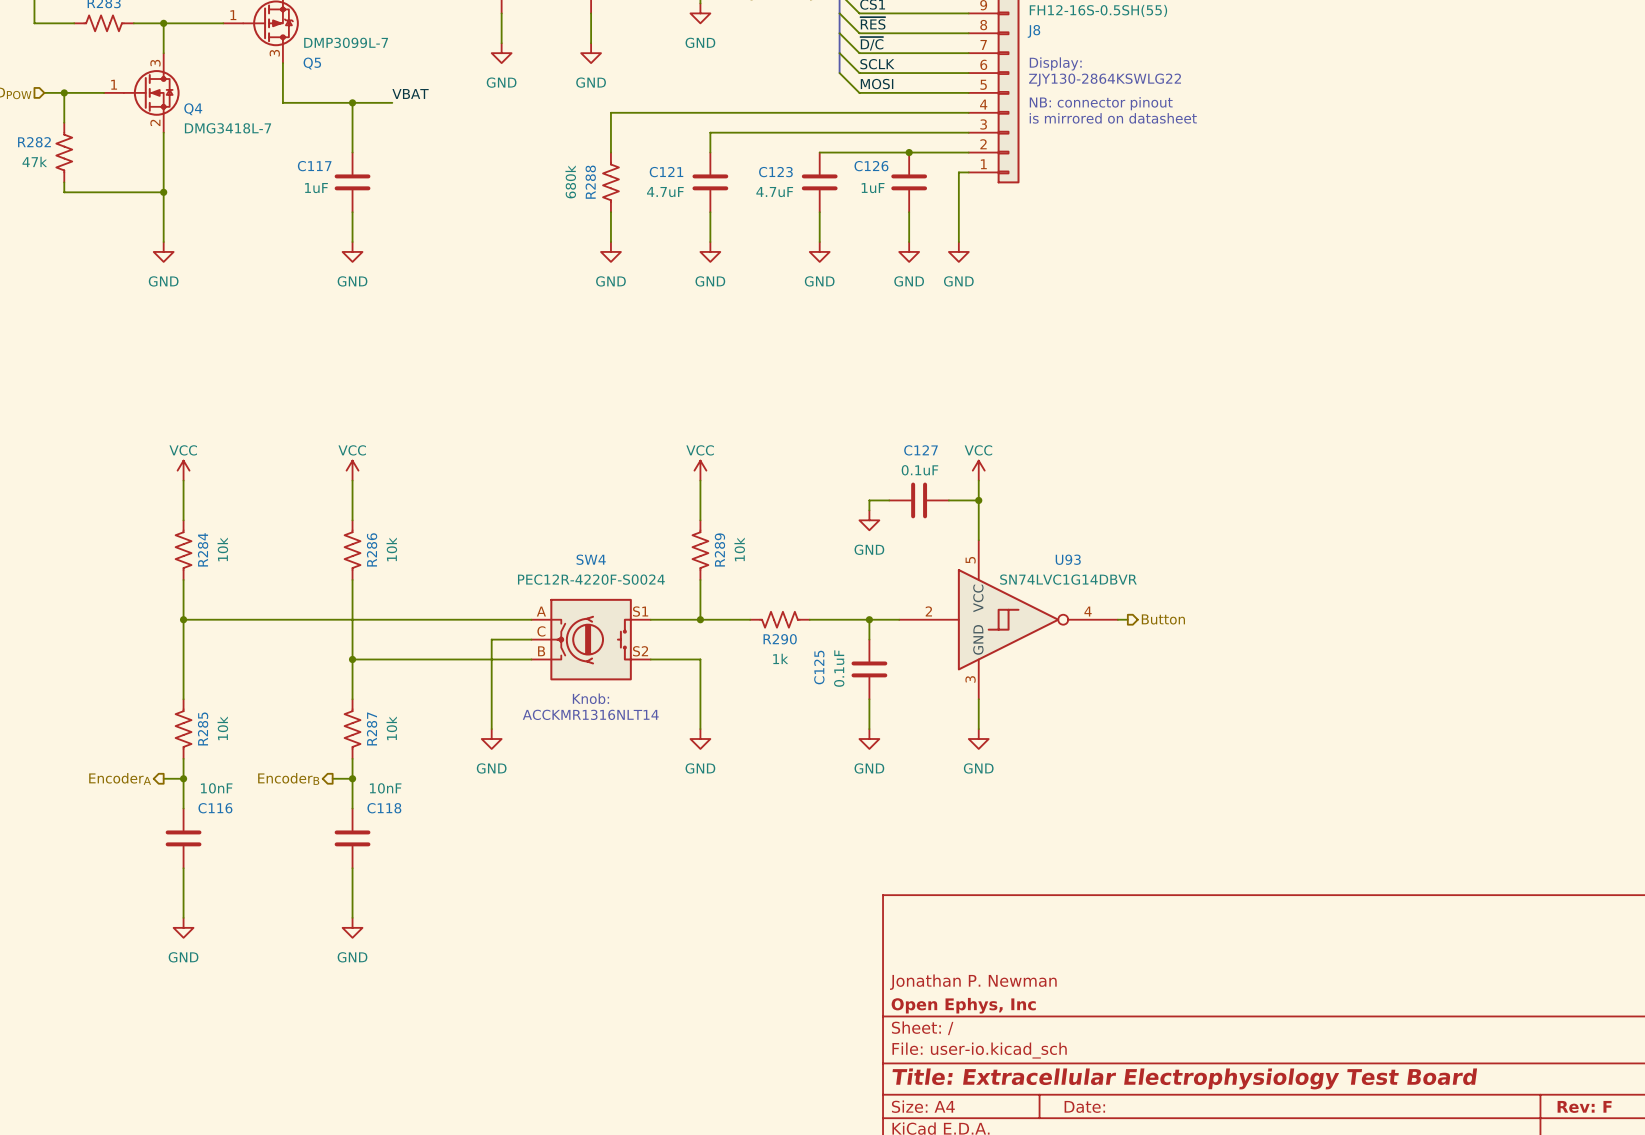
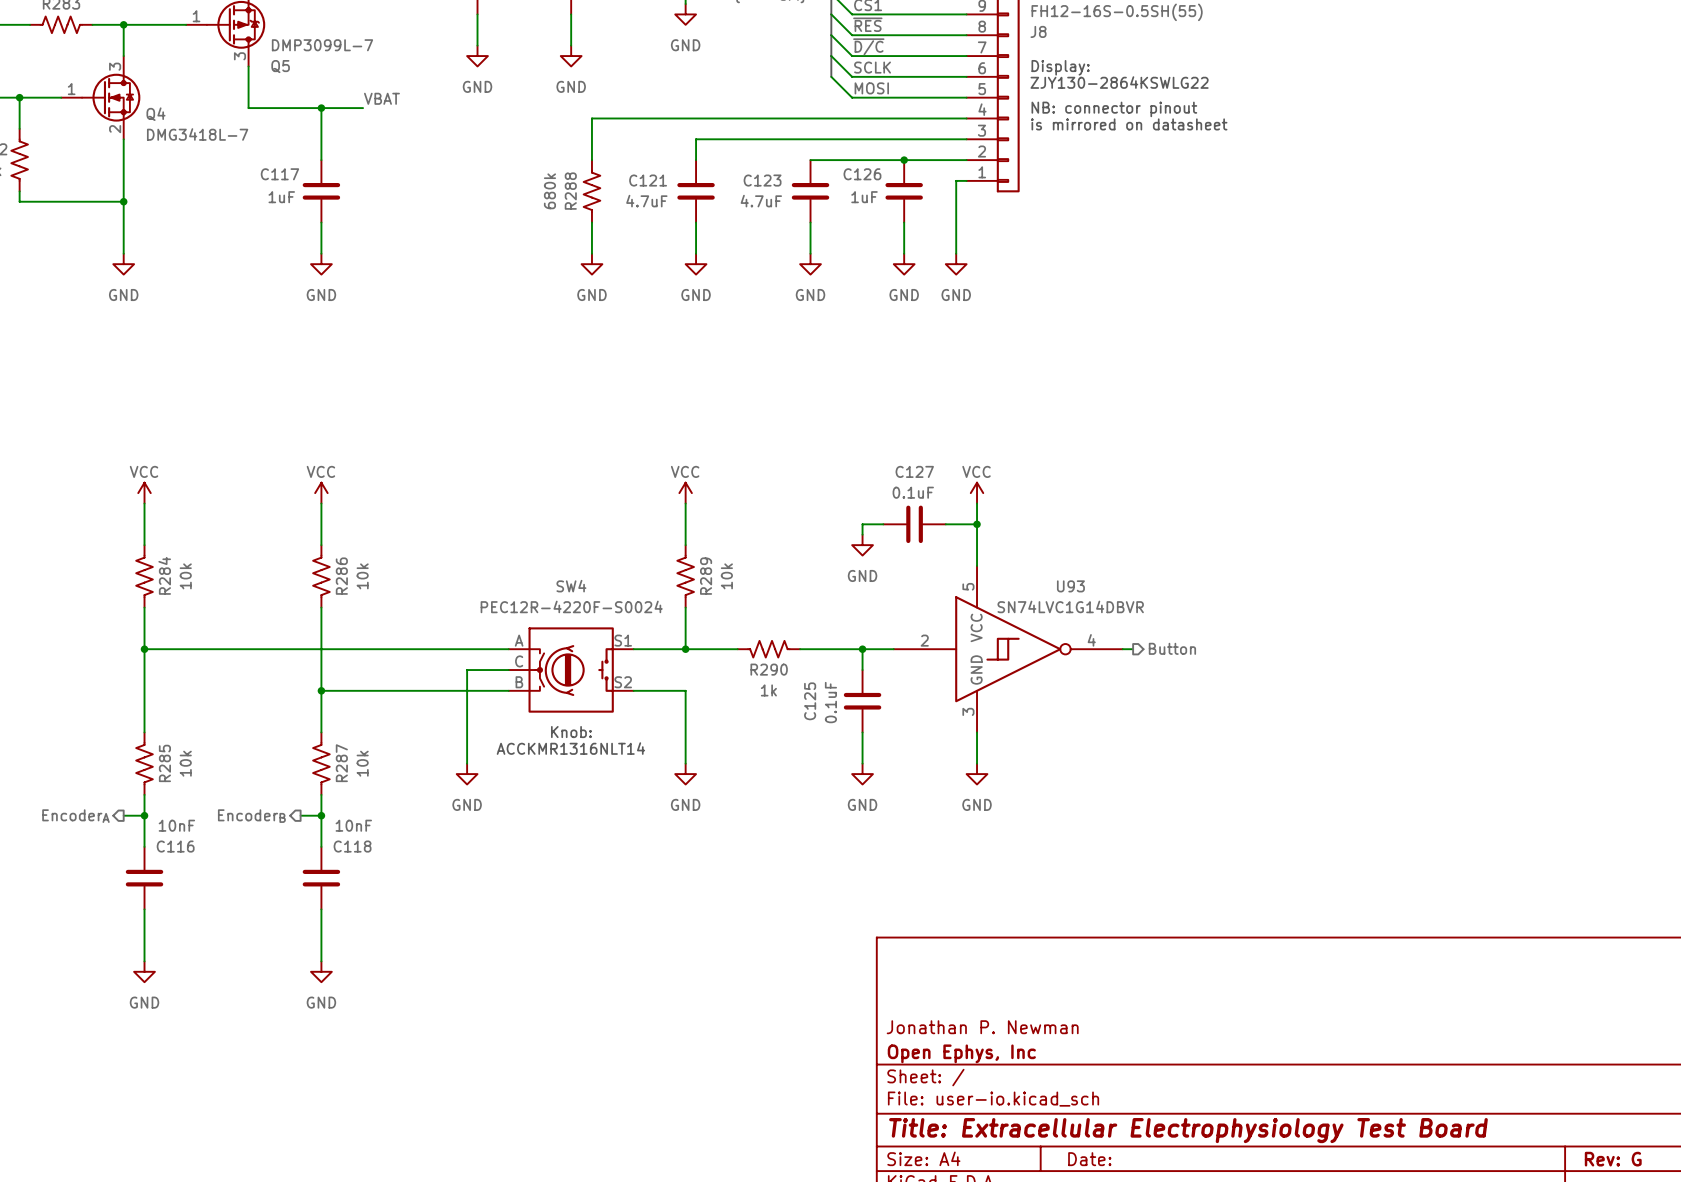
title block: Rev: F (1584, 1106) -> Rev: G (1613, 1159)

